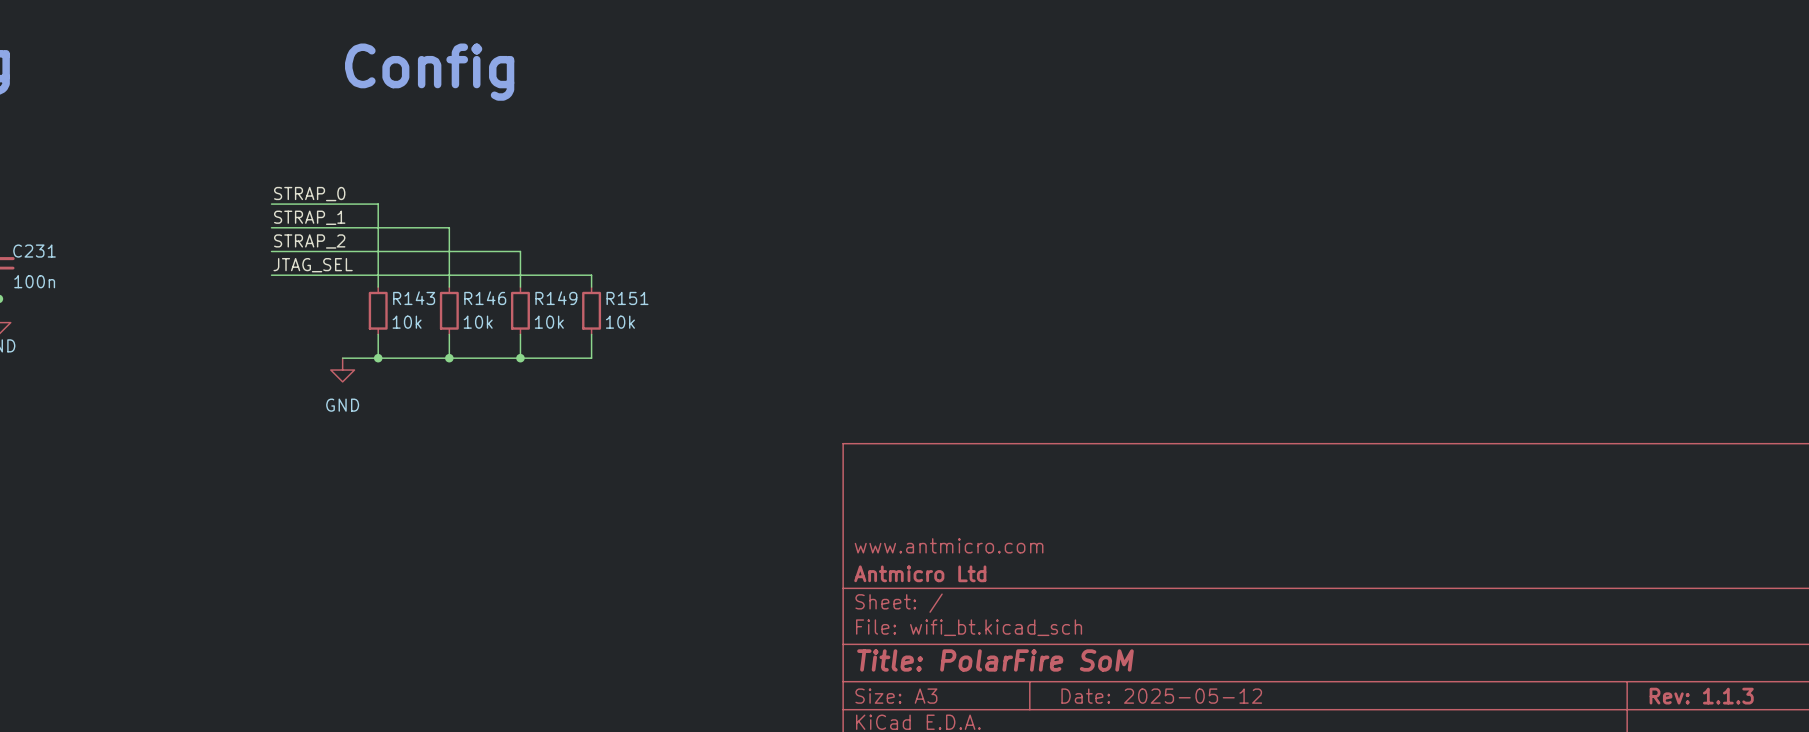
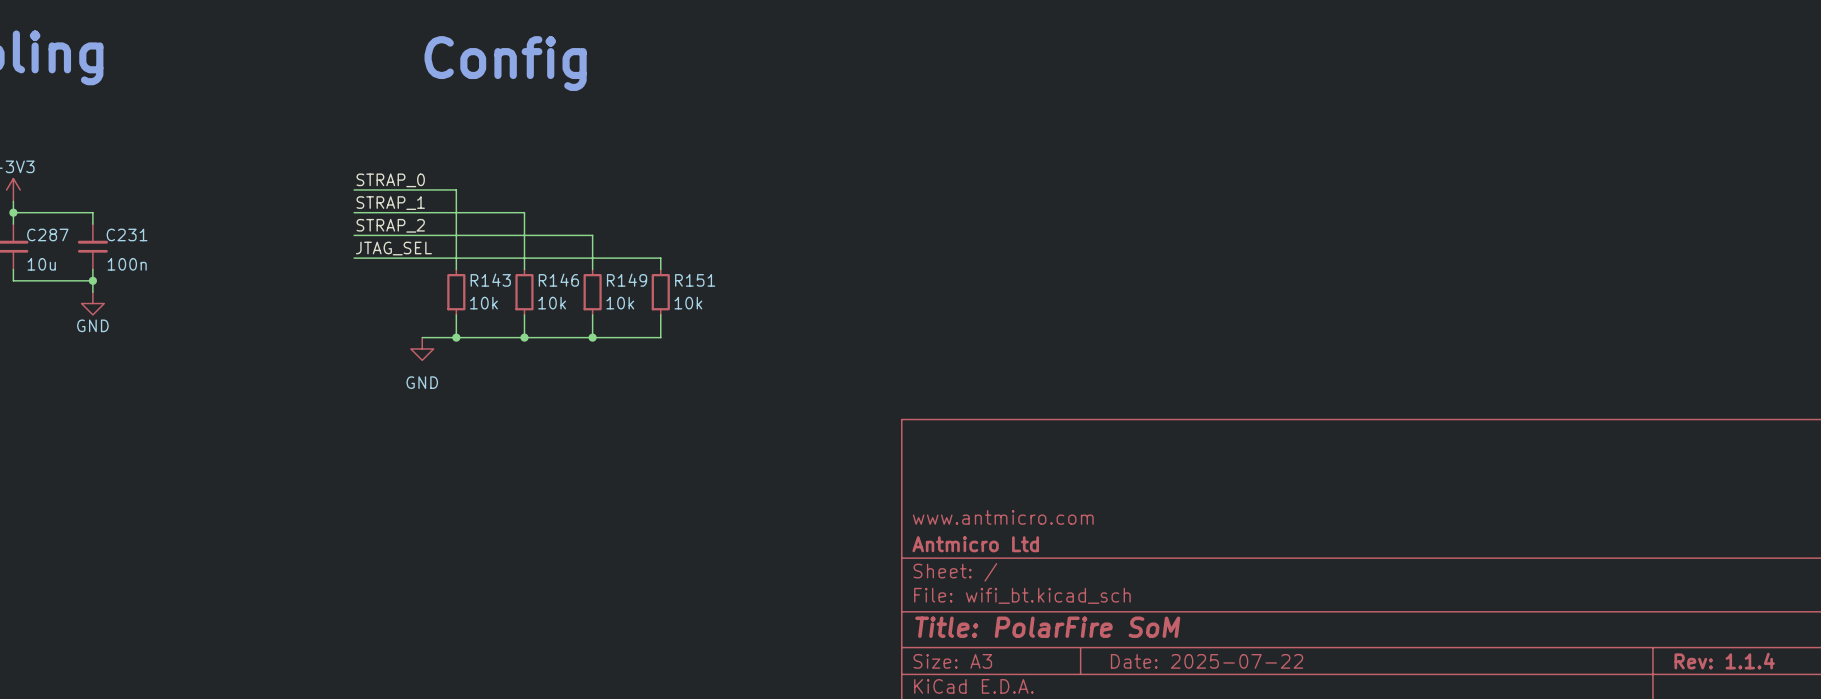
title block: Date: 2025-05-12 (1161, 696) -> Date: 2025-07-22 (1207, 661)
title block: Rev: 1.1.3 (1701, 696) -> Rev: 1.1.4 (1724, 661)

